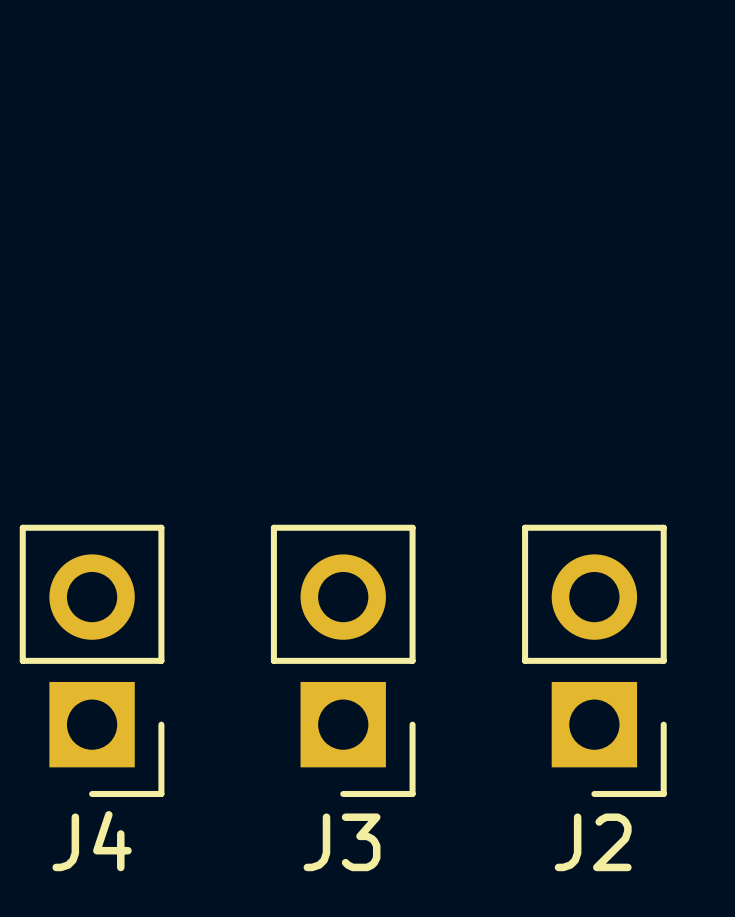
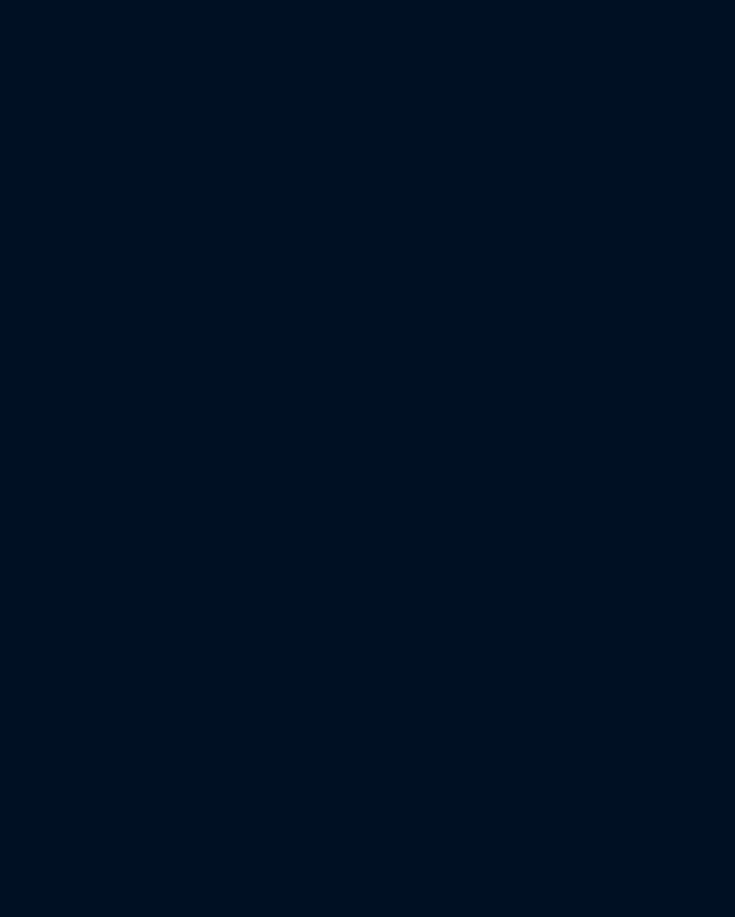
J4: (92, 660) -> none
J3: (343, 660) -> none
J2: (594, 660) -> none

